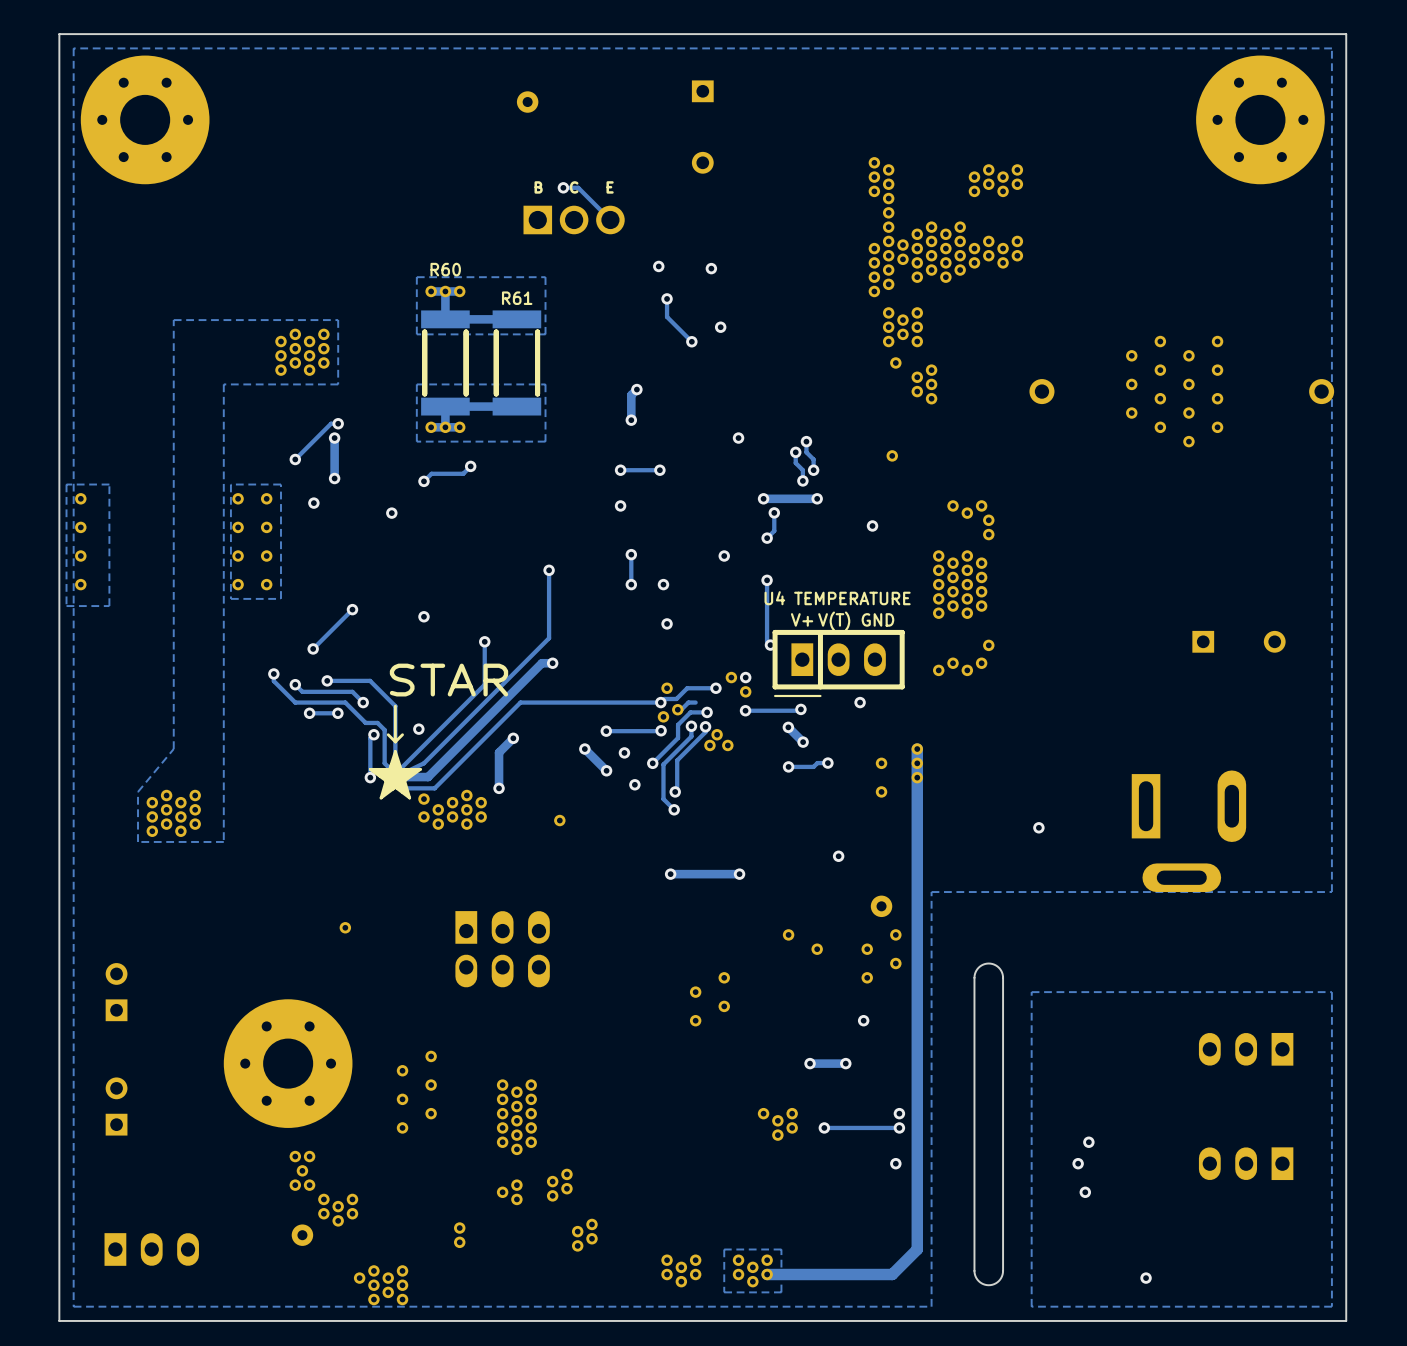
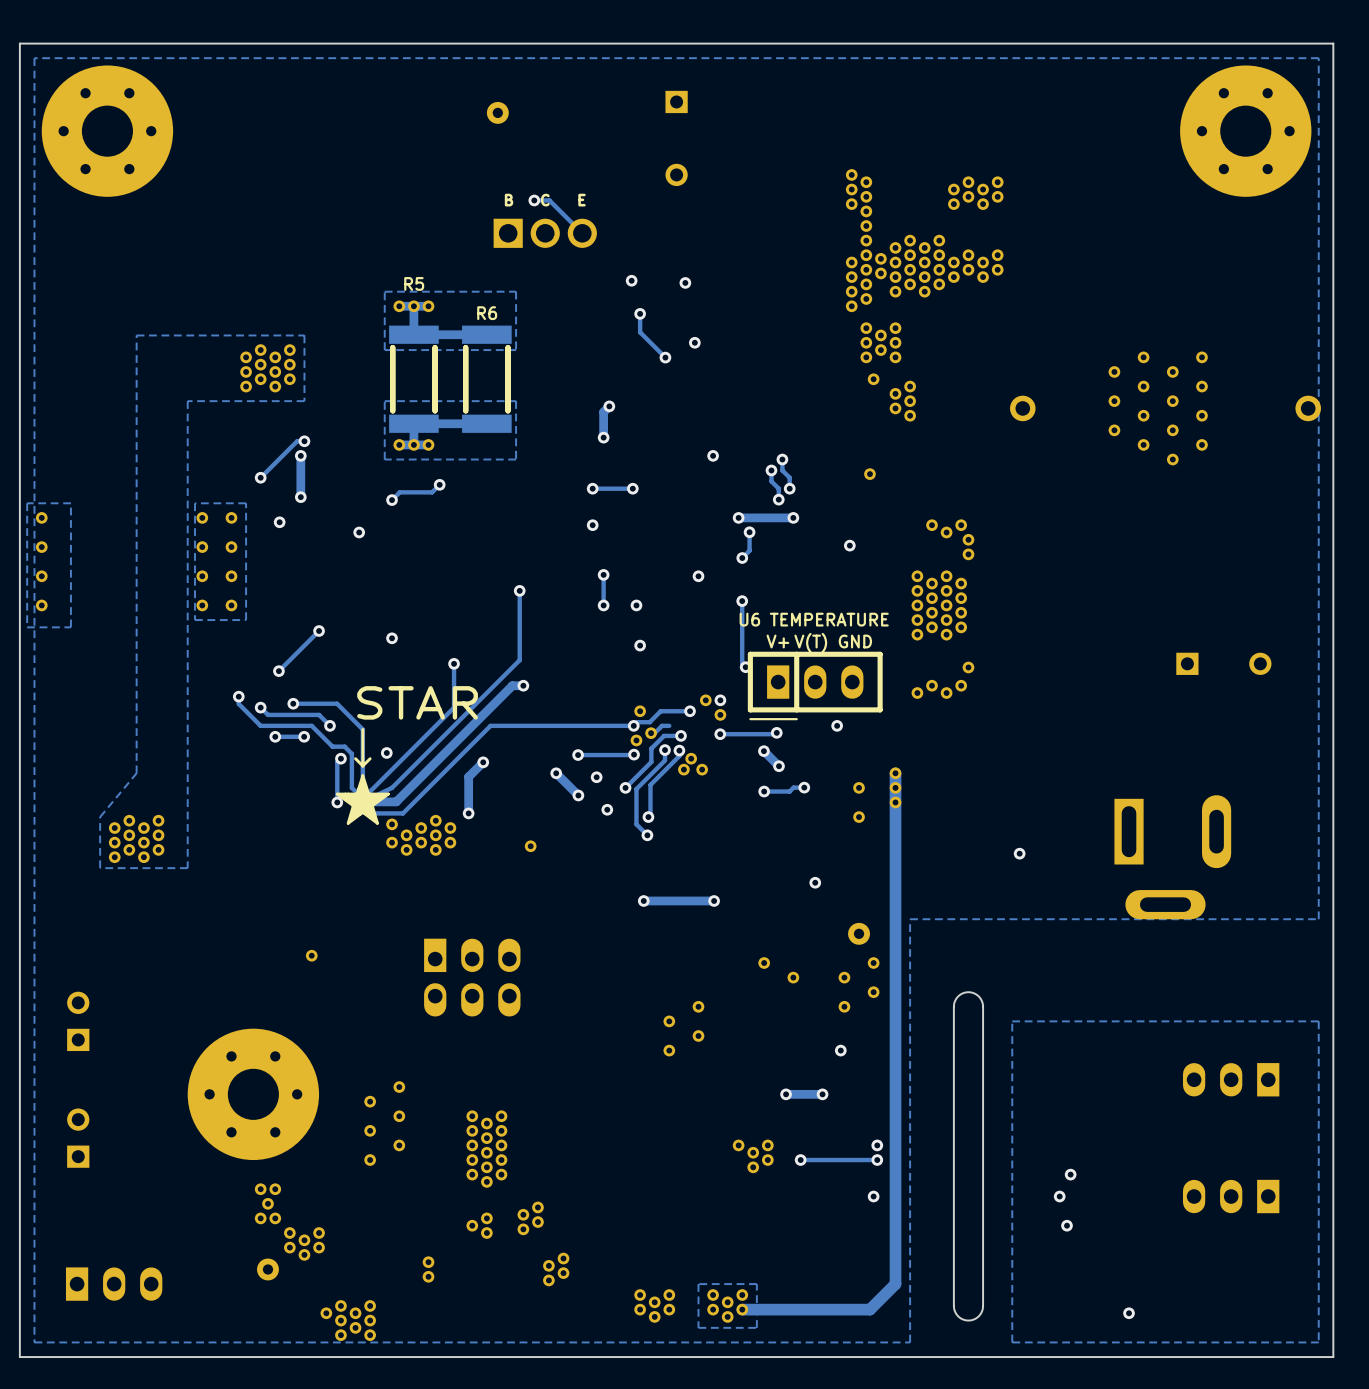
R60 name: R60 (445, 269) -> R5 (414, 283)
R61 name: R61 (517, 298) -> R6 (487, 313)
U4 name: U4 (774, 598) -> U6 (749, 619)

